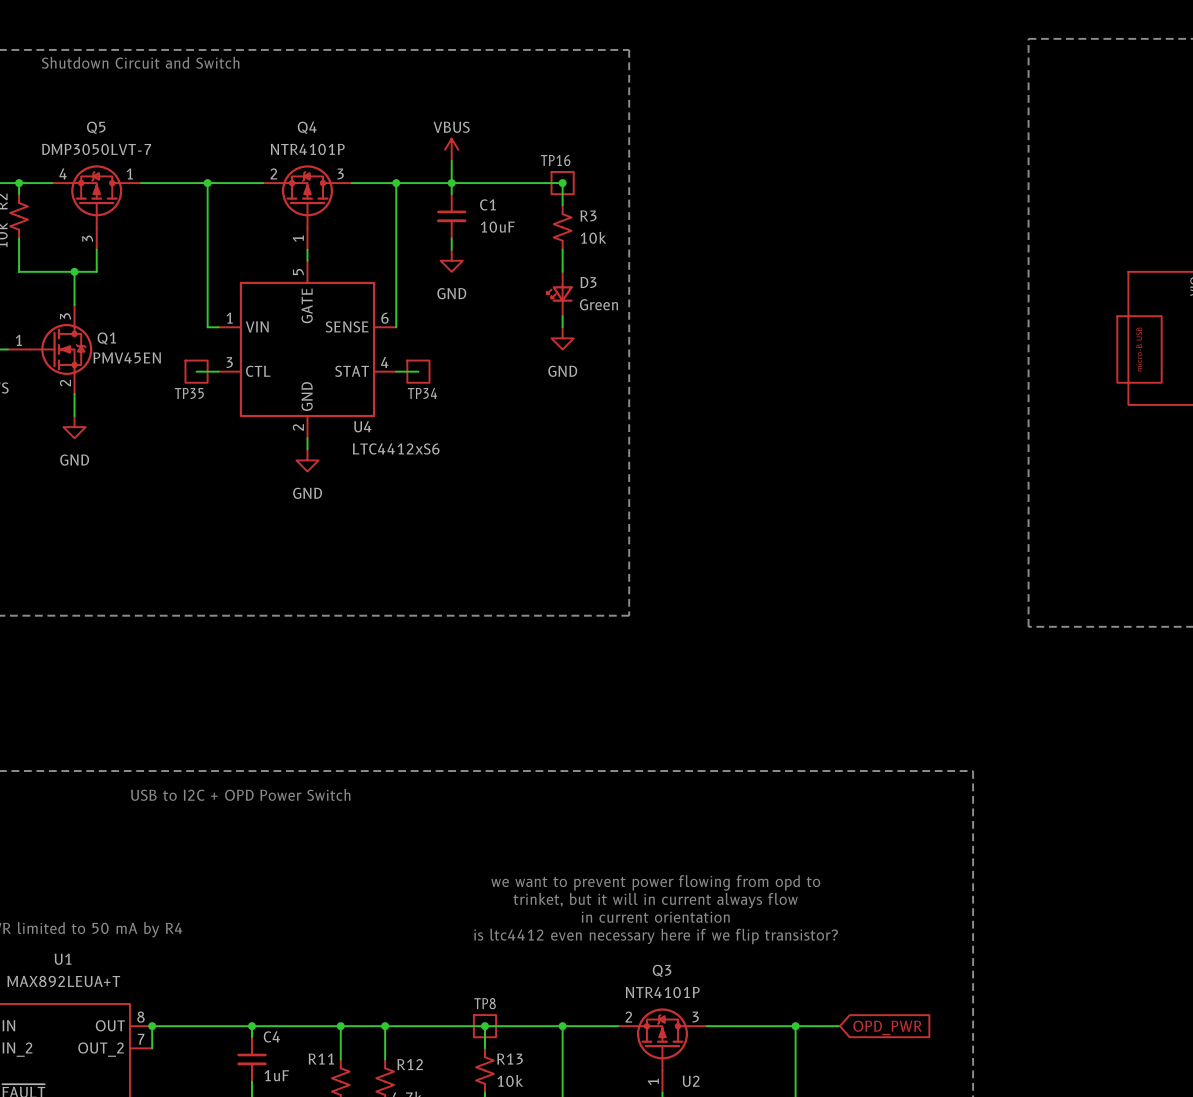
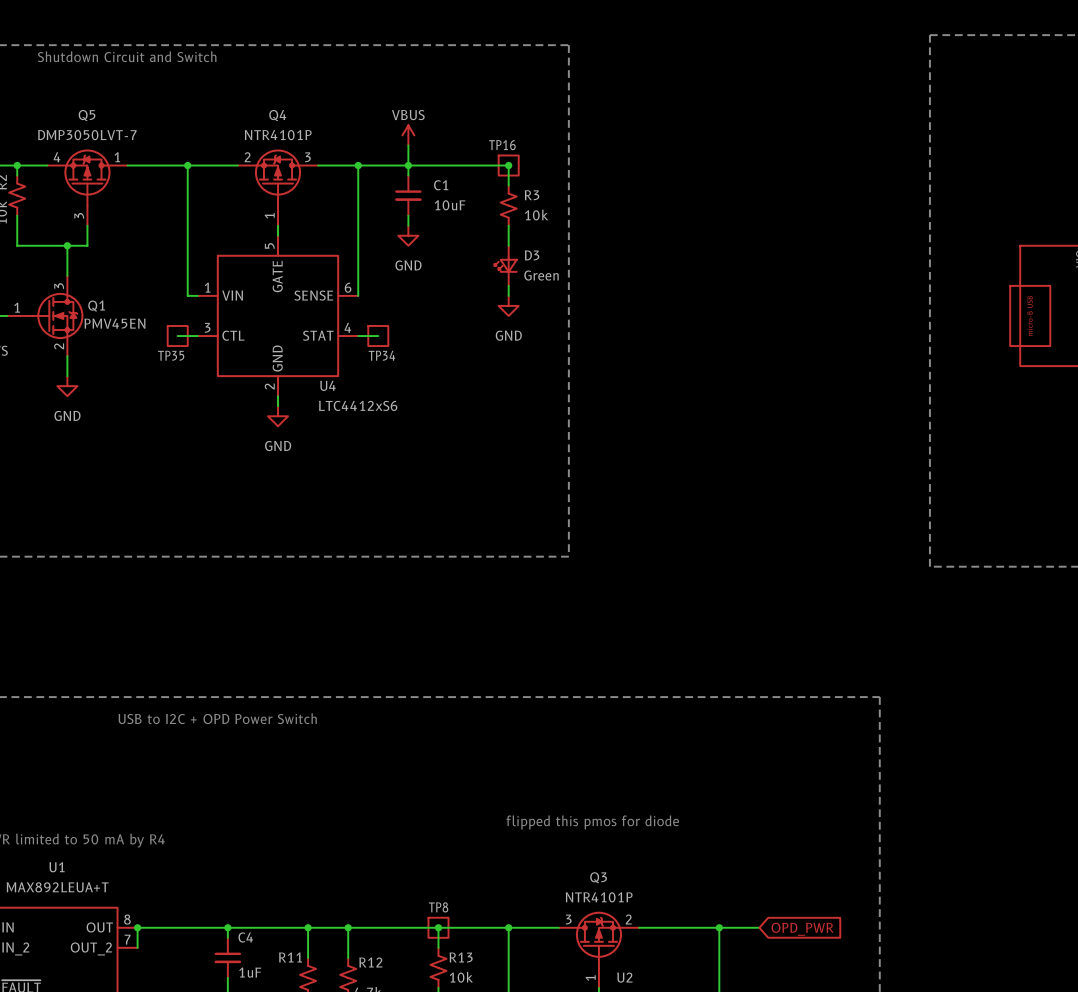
text: we want to prevent power flowing from opd to (655, 882) -> none
text: trinket, but it will in current always flow (655, 900) -> none
text: none -> flipped this pmos for diode (592, 822)
text: in current orientation (655, 917) -> none
text: is ltc4412 even necessary here if we flip transistor? (656, 936) -> none
Q3 flip: as is (662, 1039) -> left-right (598, 939)

